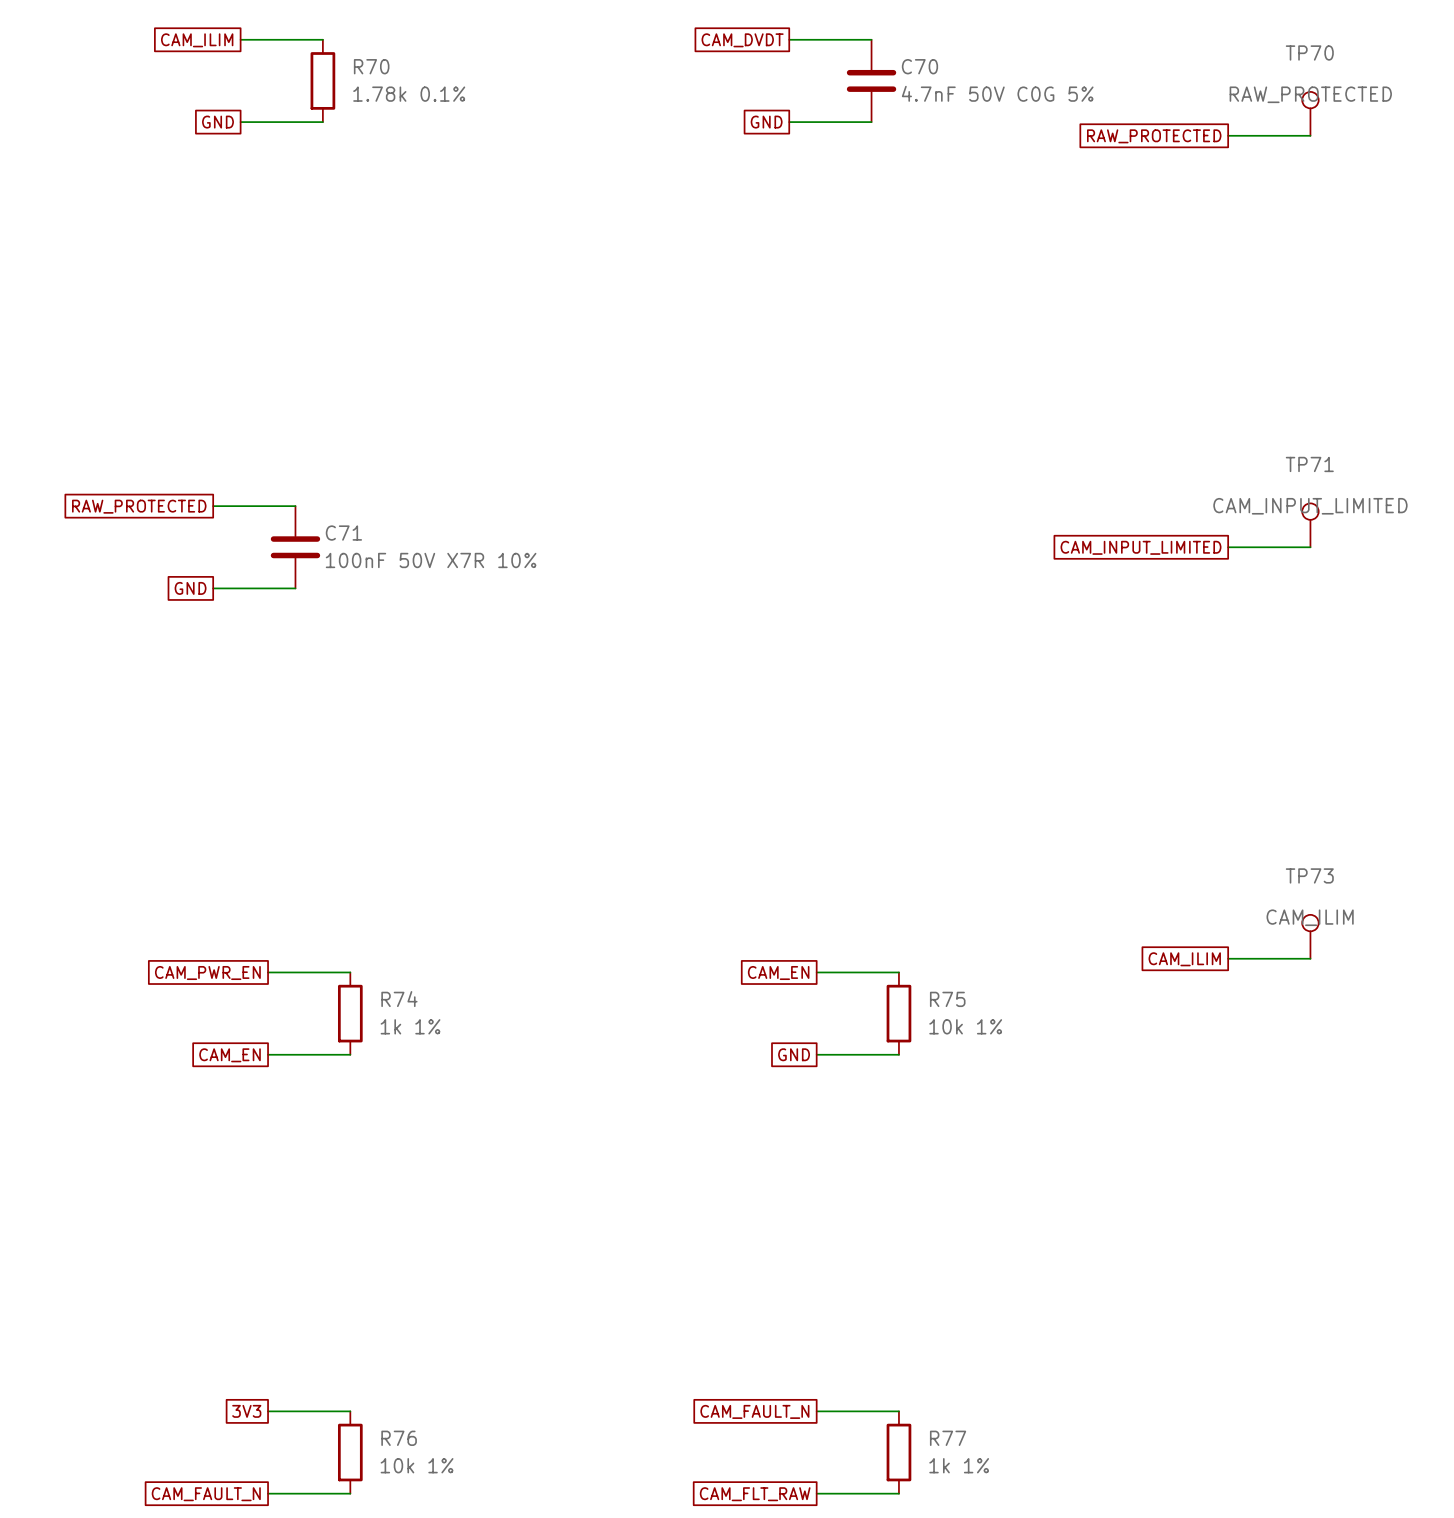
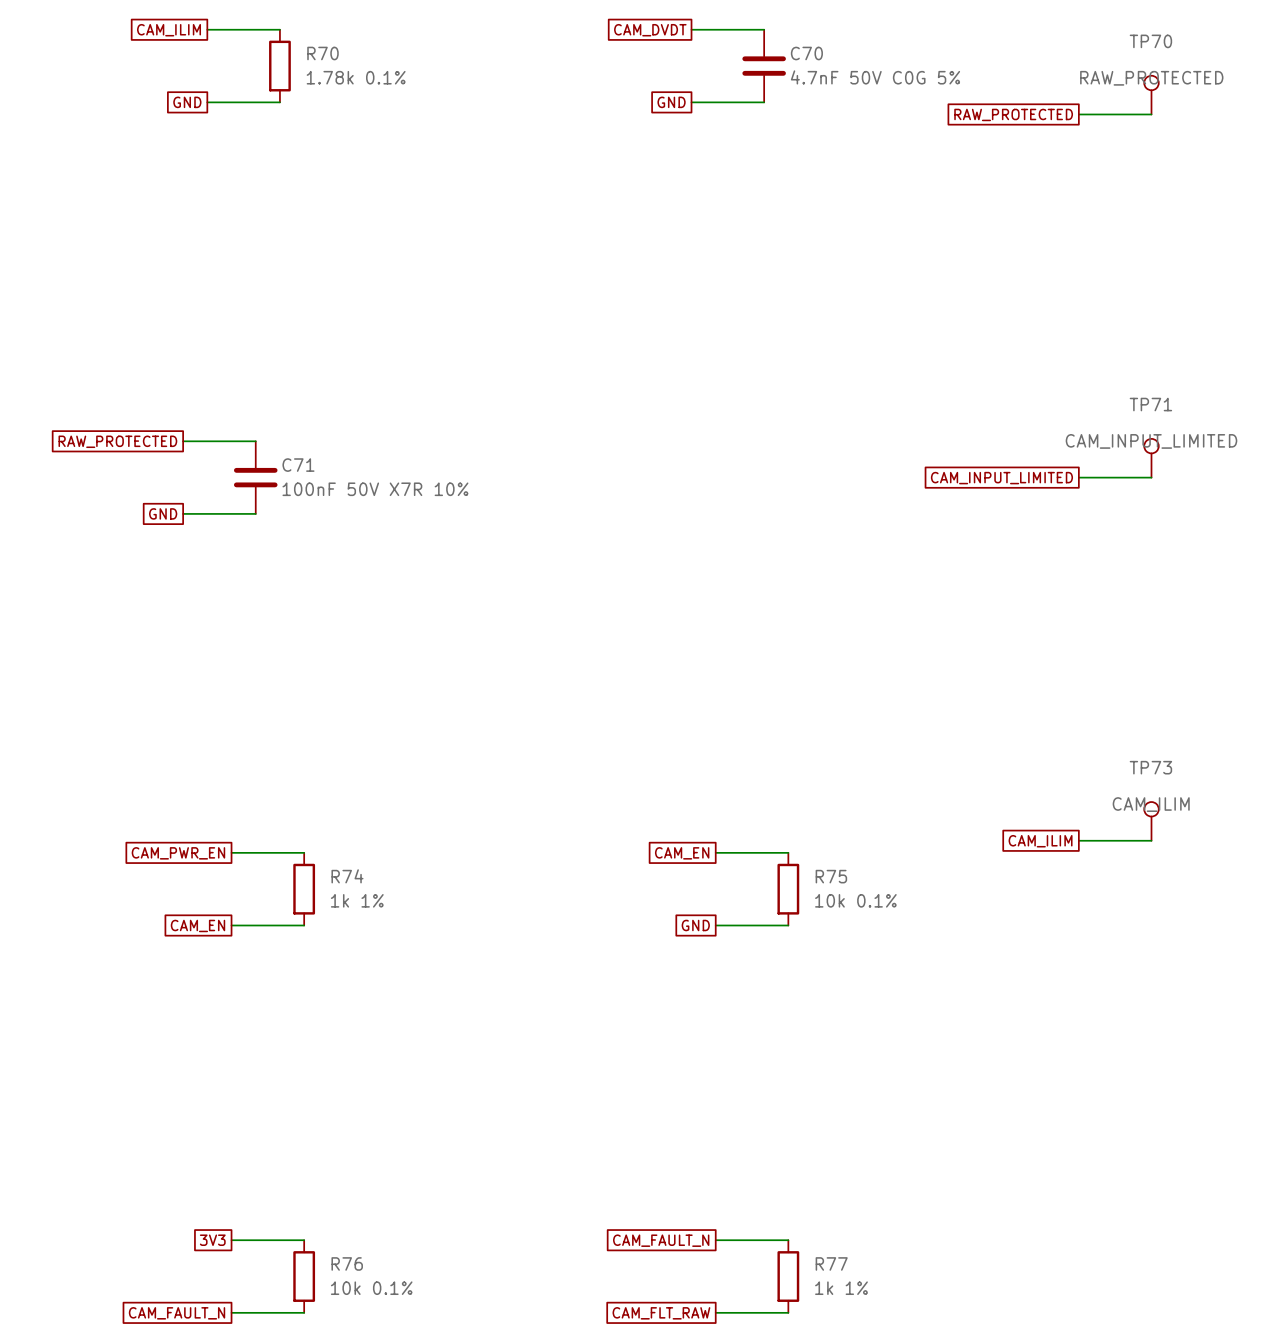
R75 value: 10k 1% (965, 1026) -> 10k 0.1% (855, 900)
R76 value: 10k 1% (417, 1465) -> 10k 0.1% (371, 1288)

